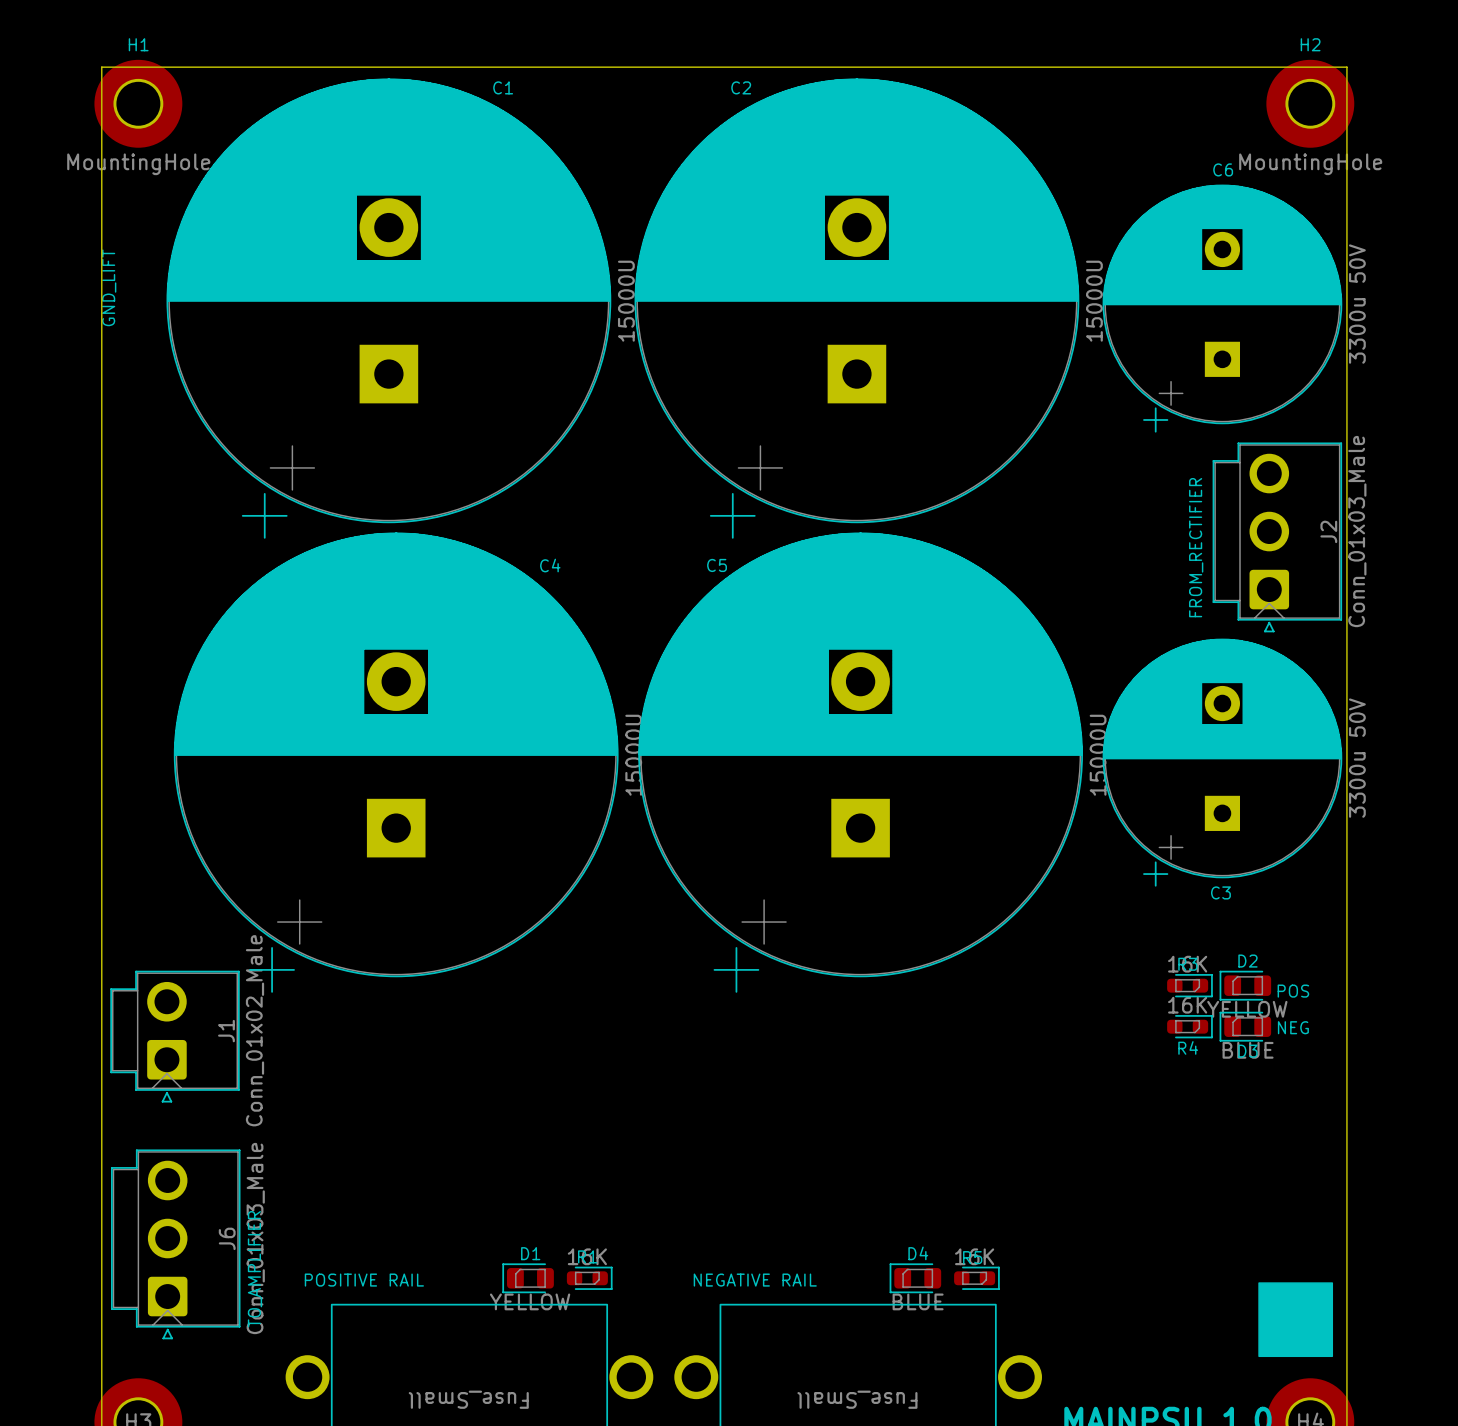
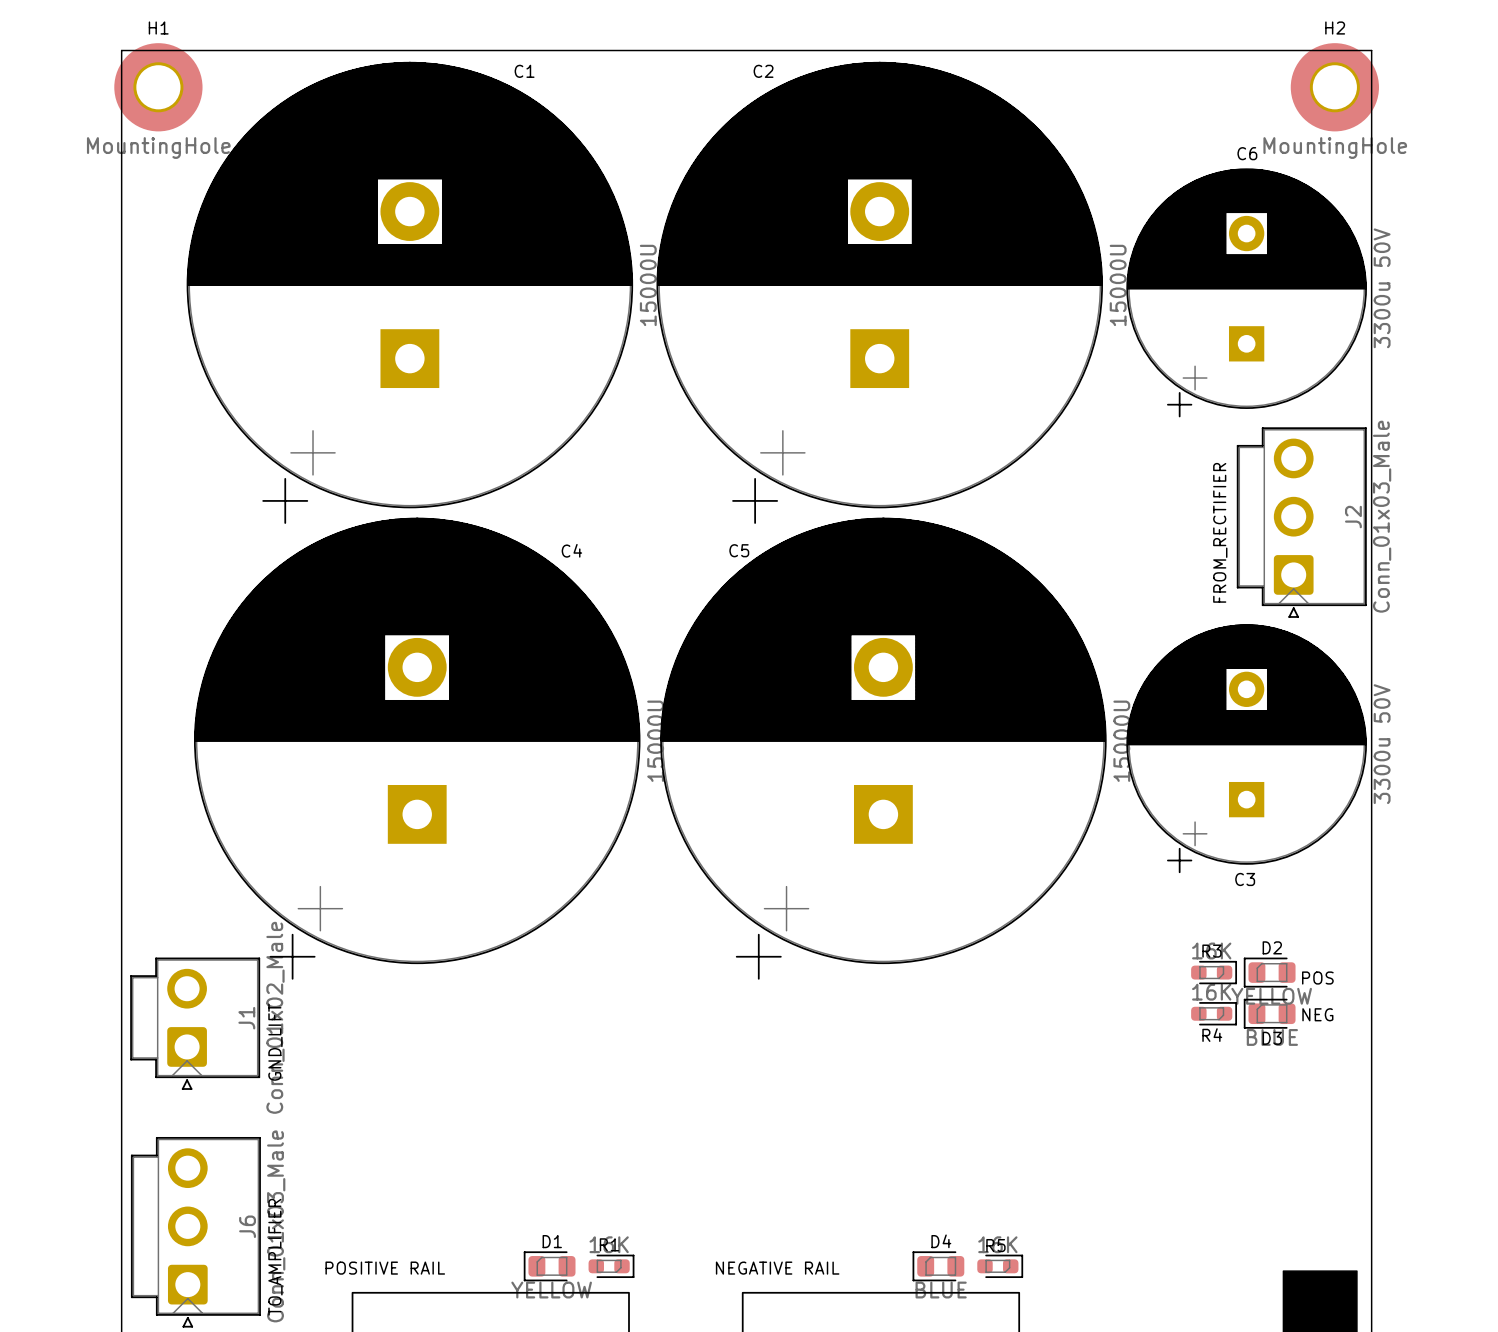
text: GND_LIFT (109, 287) -> none
text: none -> GND_LIFT (275, 1042)

